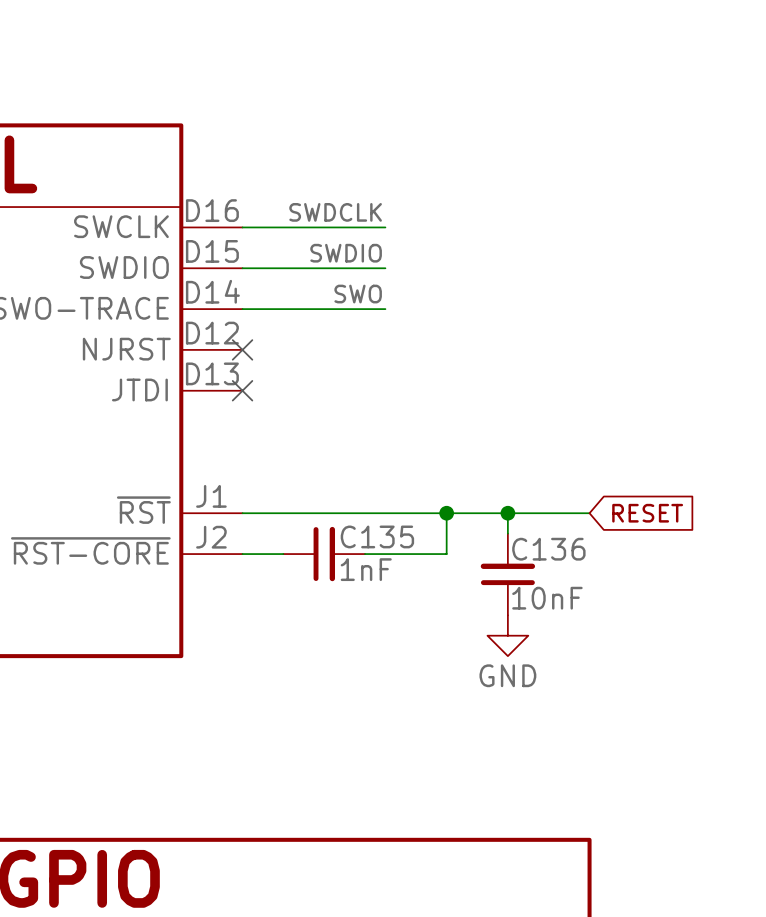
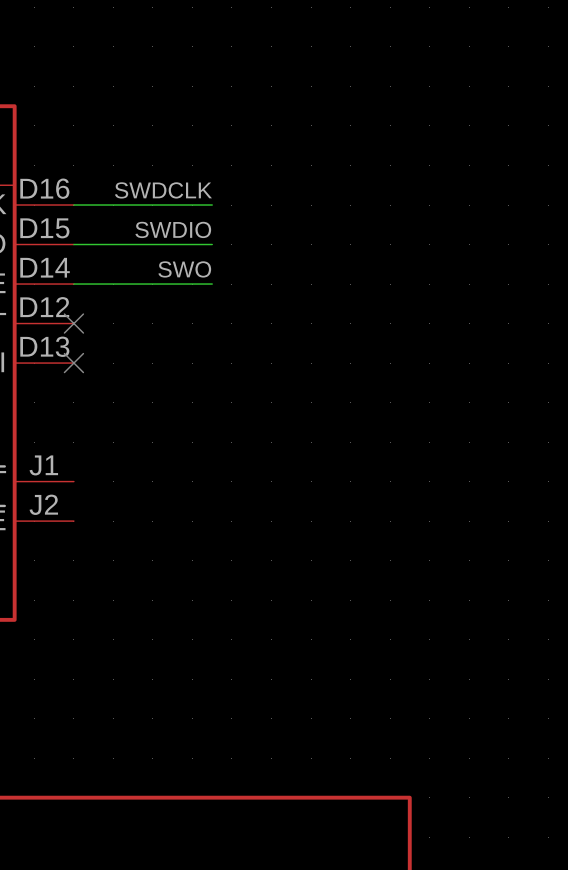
wire: (242, 513) (589, 513) -> none
wire: (446, 513) (446, 554) (365, 554) -> none
junction: (446, 513) -> none
wire: (507, 513) (507, 533) -> none
junction: (507, 513) -> none
global label: RESET (647, 513) -> none
wire: (242, 554) (283, 554) -> none
C135: 1nF (324, 554) -> none
C136: 10nF (507, 574) -> none
power symbol: GND (507, 635) -> none

